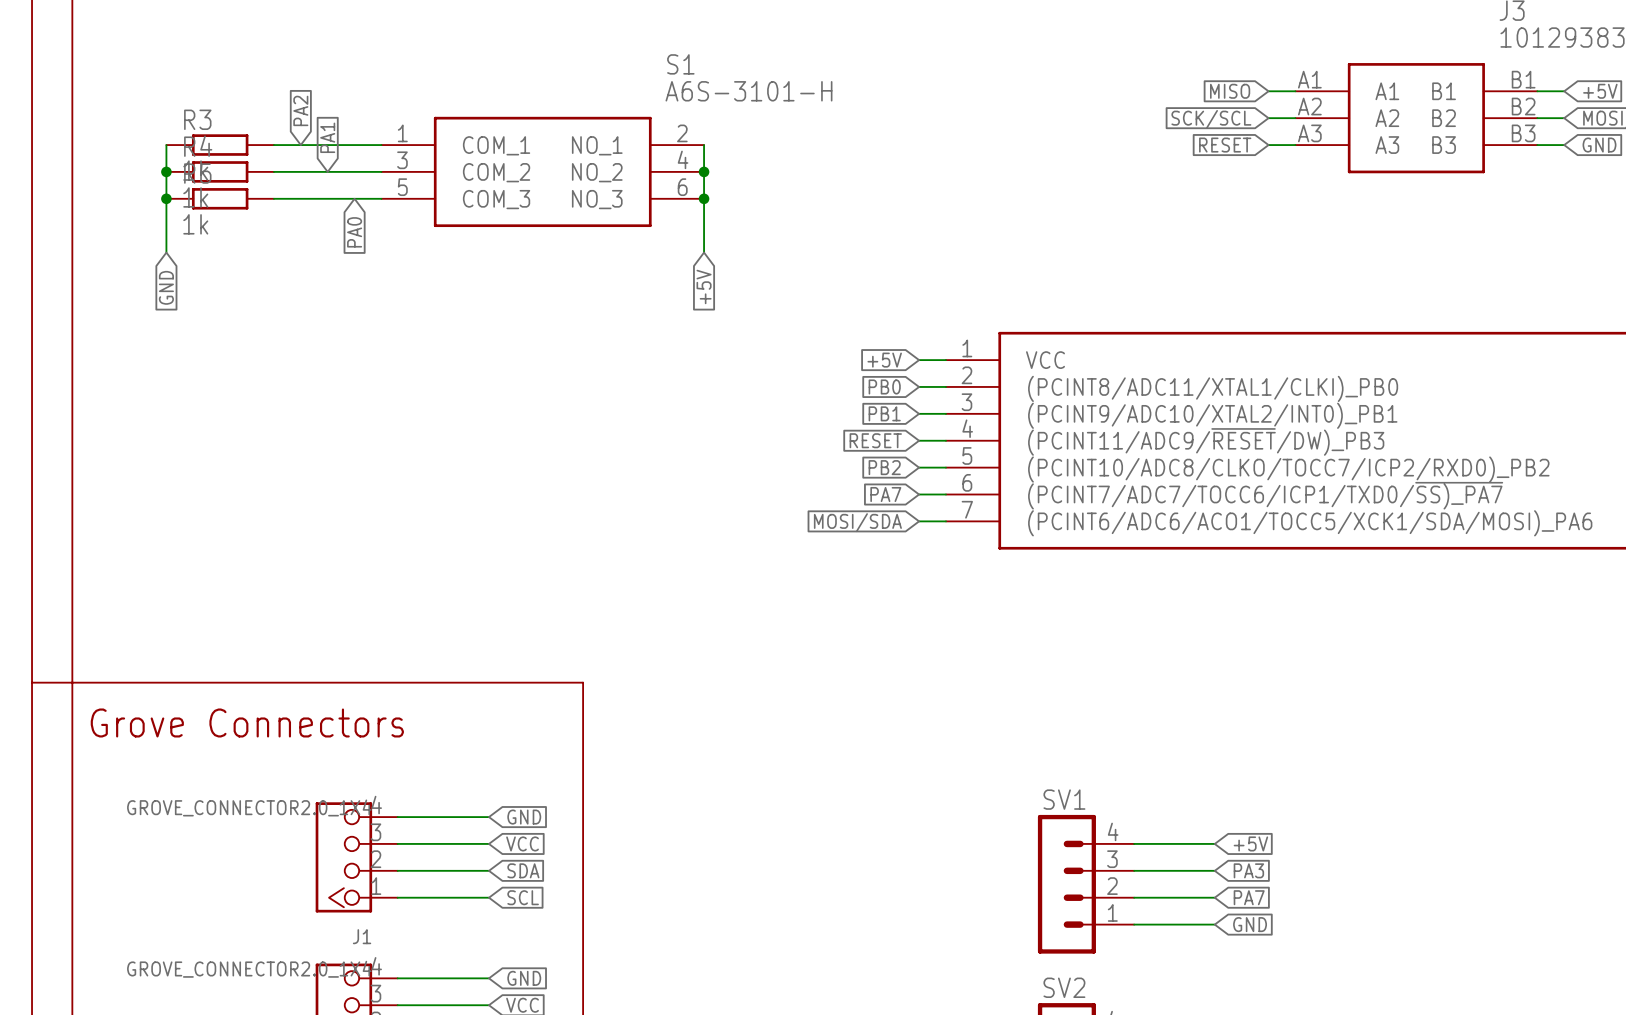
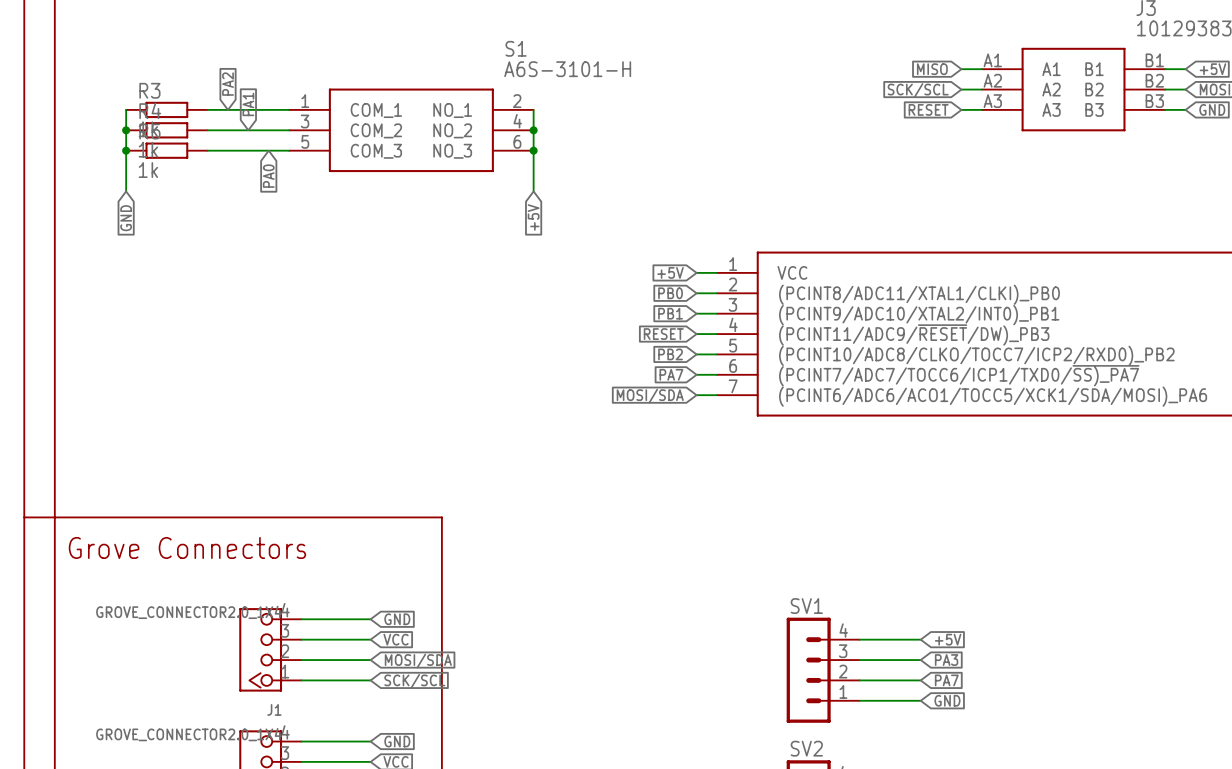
global label: SDA (523, 870) -> MOSI/SDA (418, 661)
global label: SCL (523, 897) -> SCK/SCL (414, 681)

